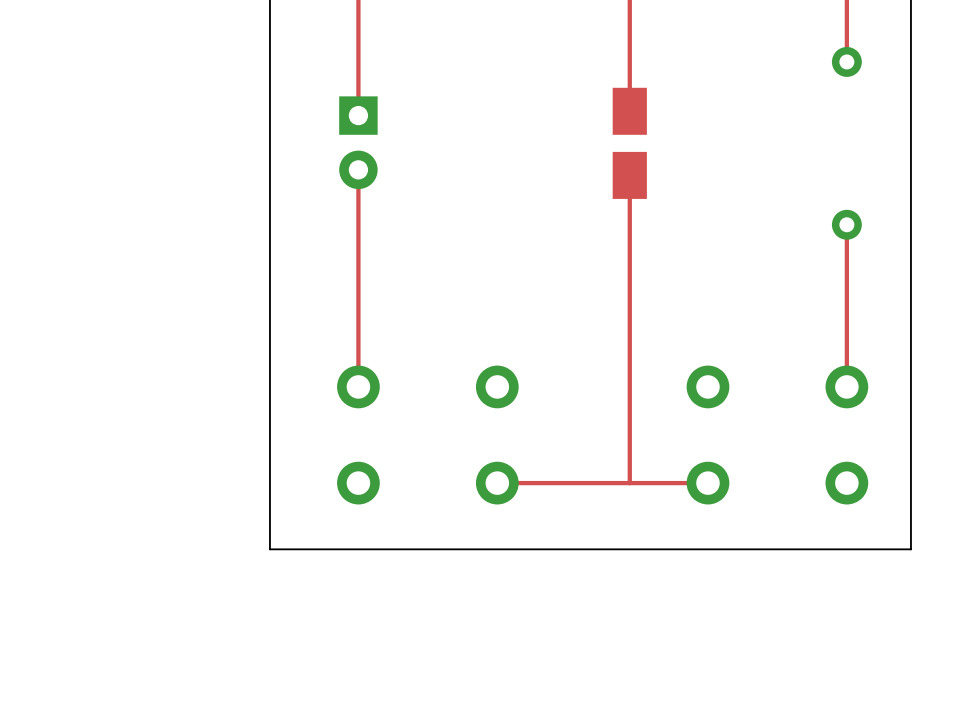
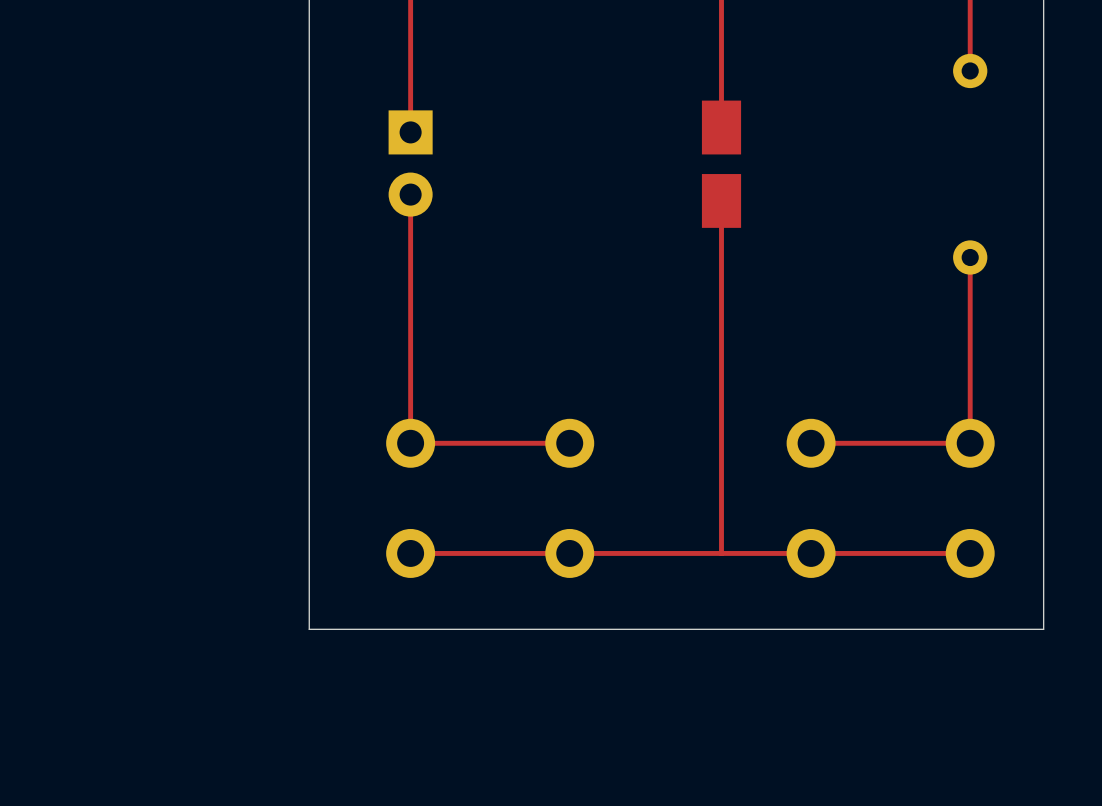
top track: none -> (569, 443) (410, 443)
top track: none -> (970, 443) (811, 443)
top track: none -> (569, 553) (410, 553)
top track: none -> (970, 553) (811, 553)

